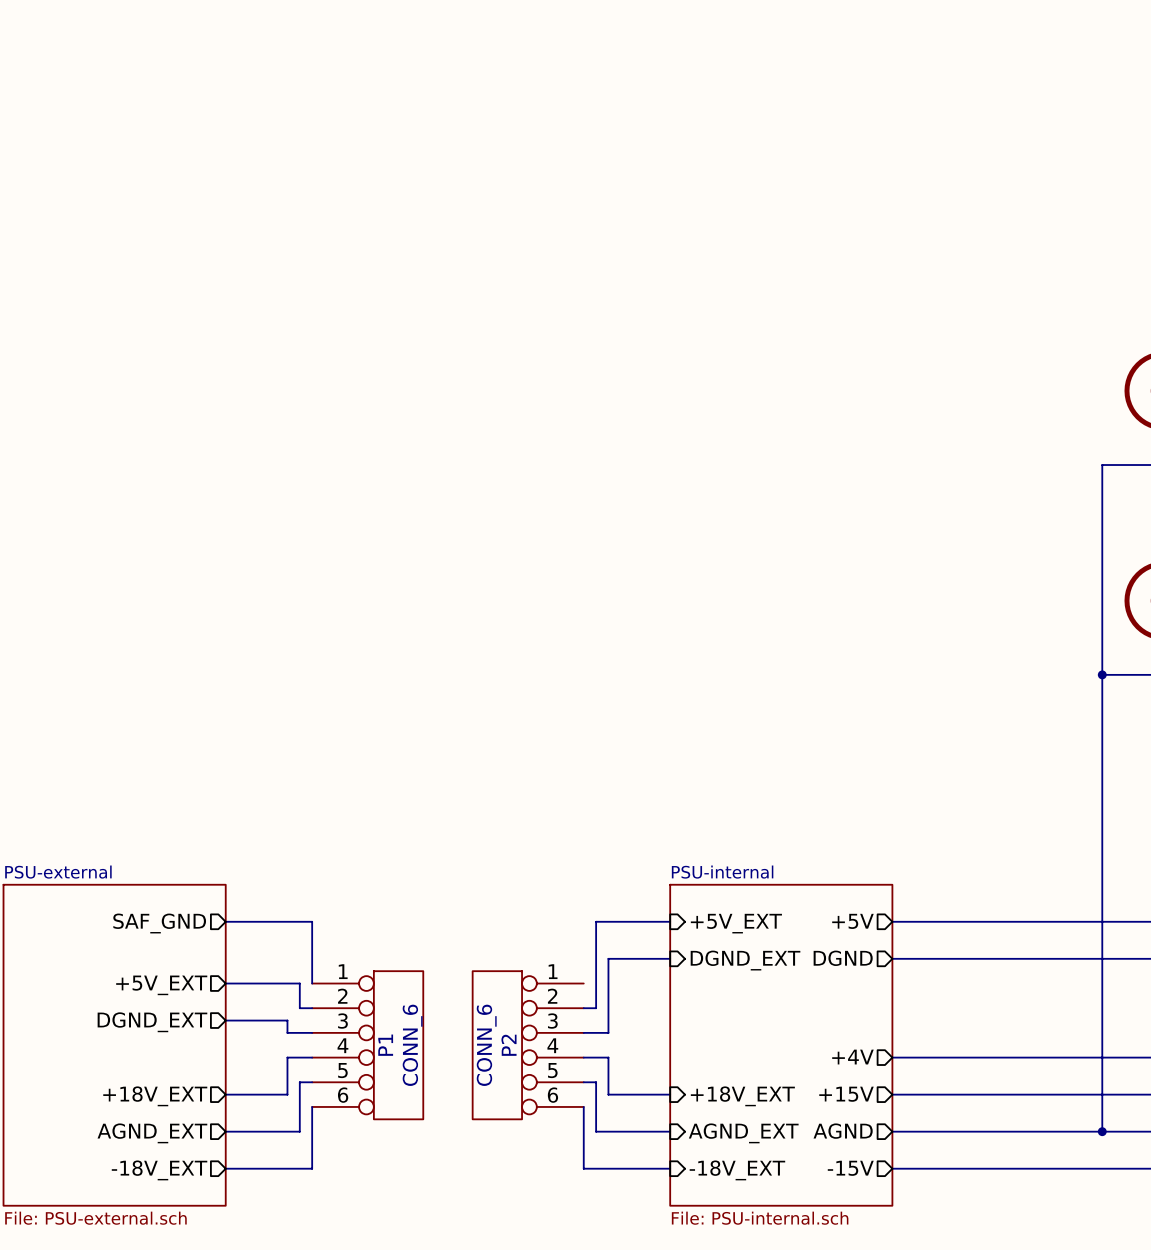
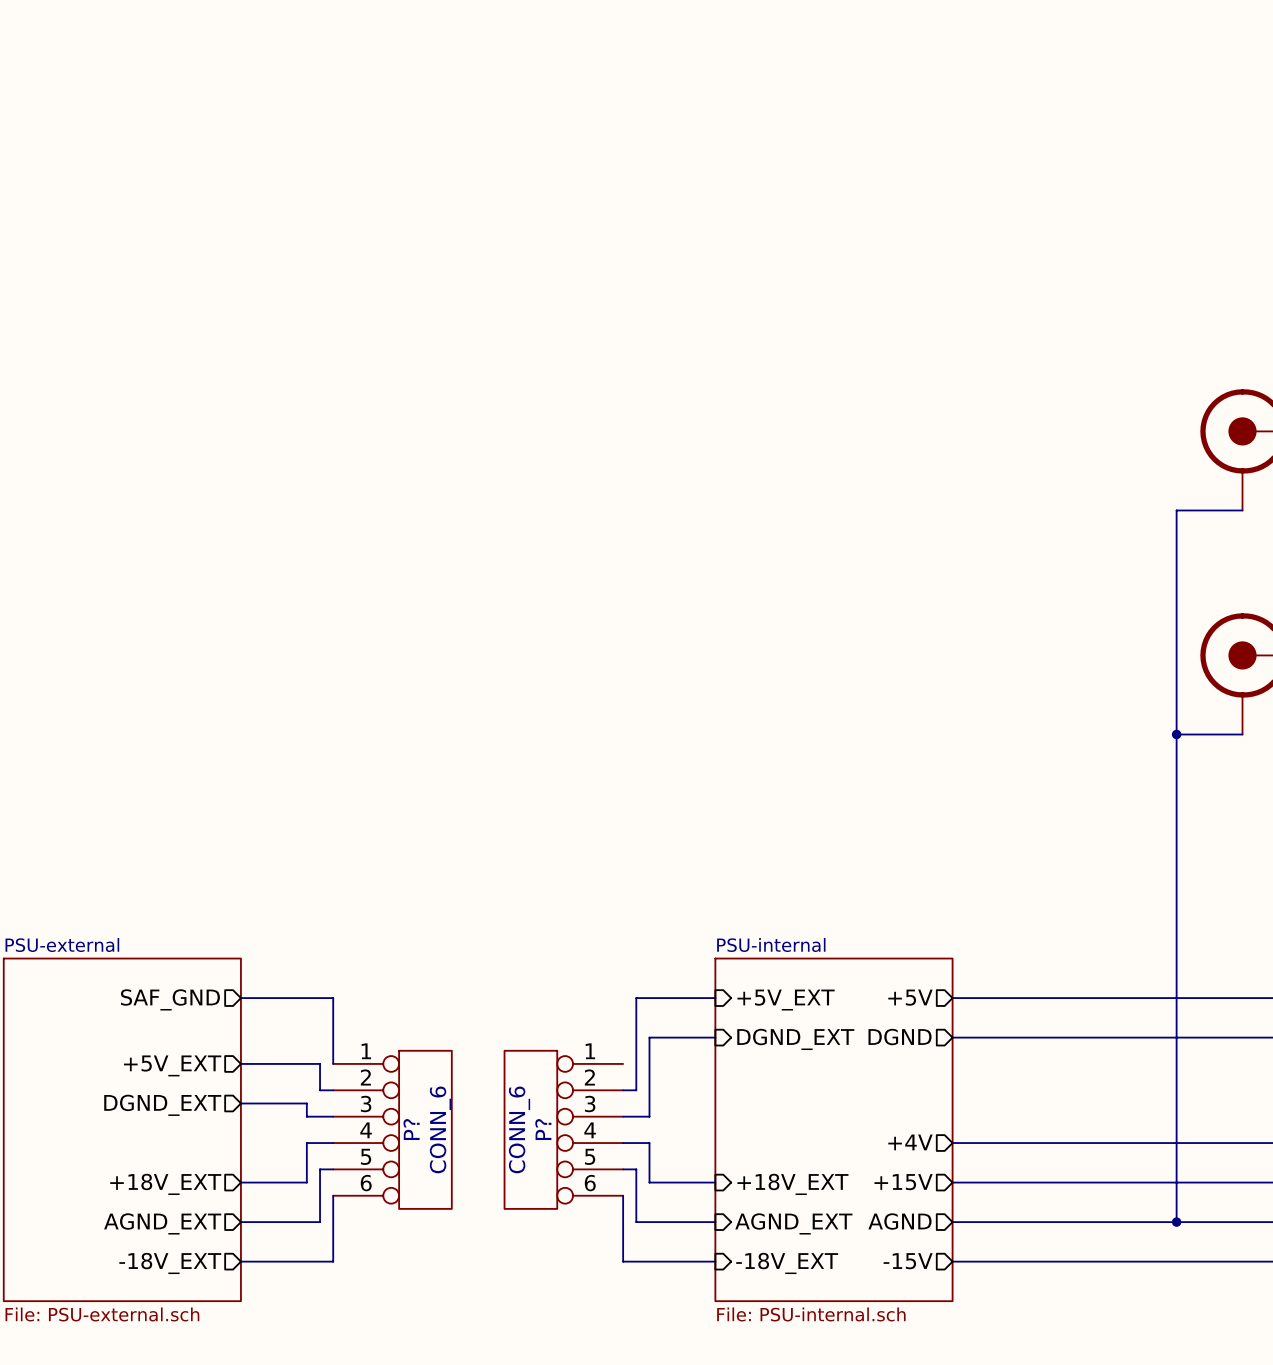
P1 name: P1 (385, 1045) -> P? (411, 1129)
P2 name: P2 (509, 1045) -> P? (543, 1129)

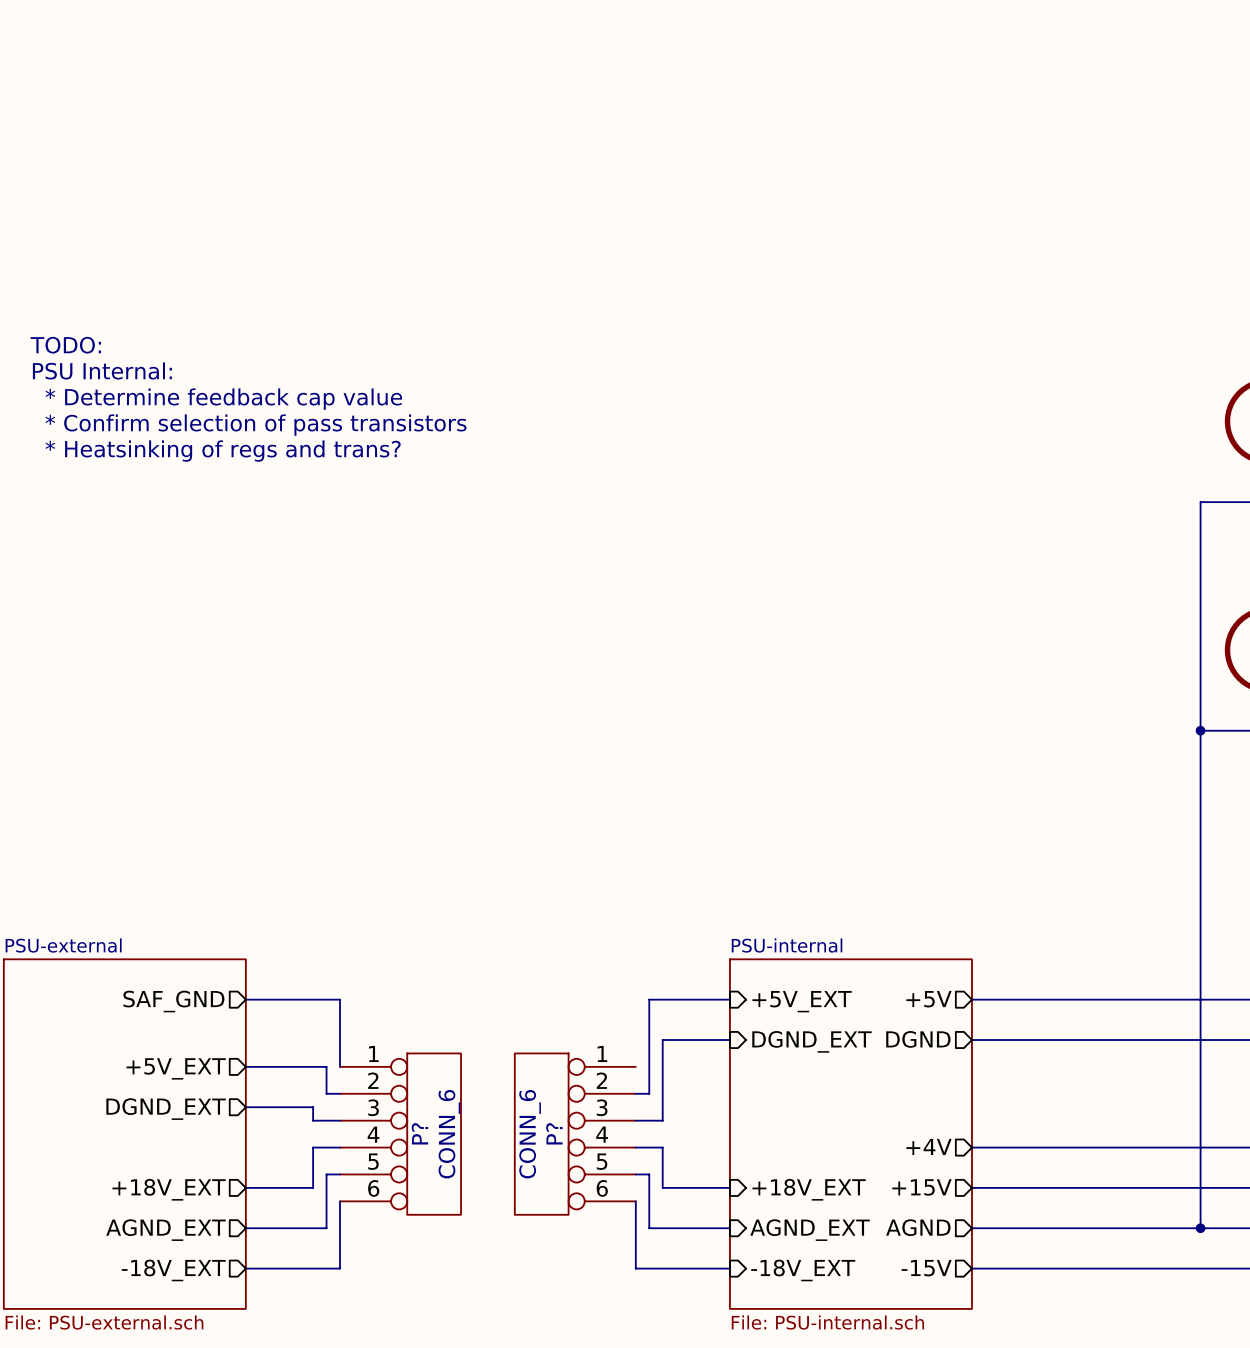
text: none -> TODO: (65, 345)
text: none -> PSU Internal: (102, 370)
text: none -> * Determine feedback cap value (223, 399)
text: none -> * Confirm selection of pass transistors (255, 425)
text: none -> * Heatsinking of regs and trans? (223, 451)

